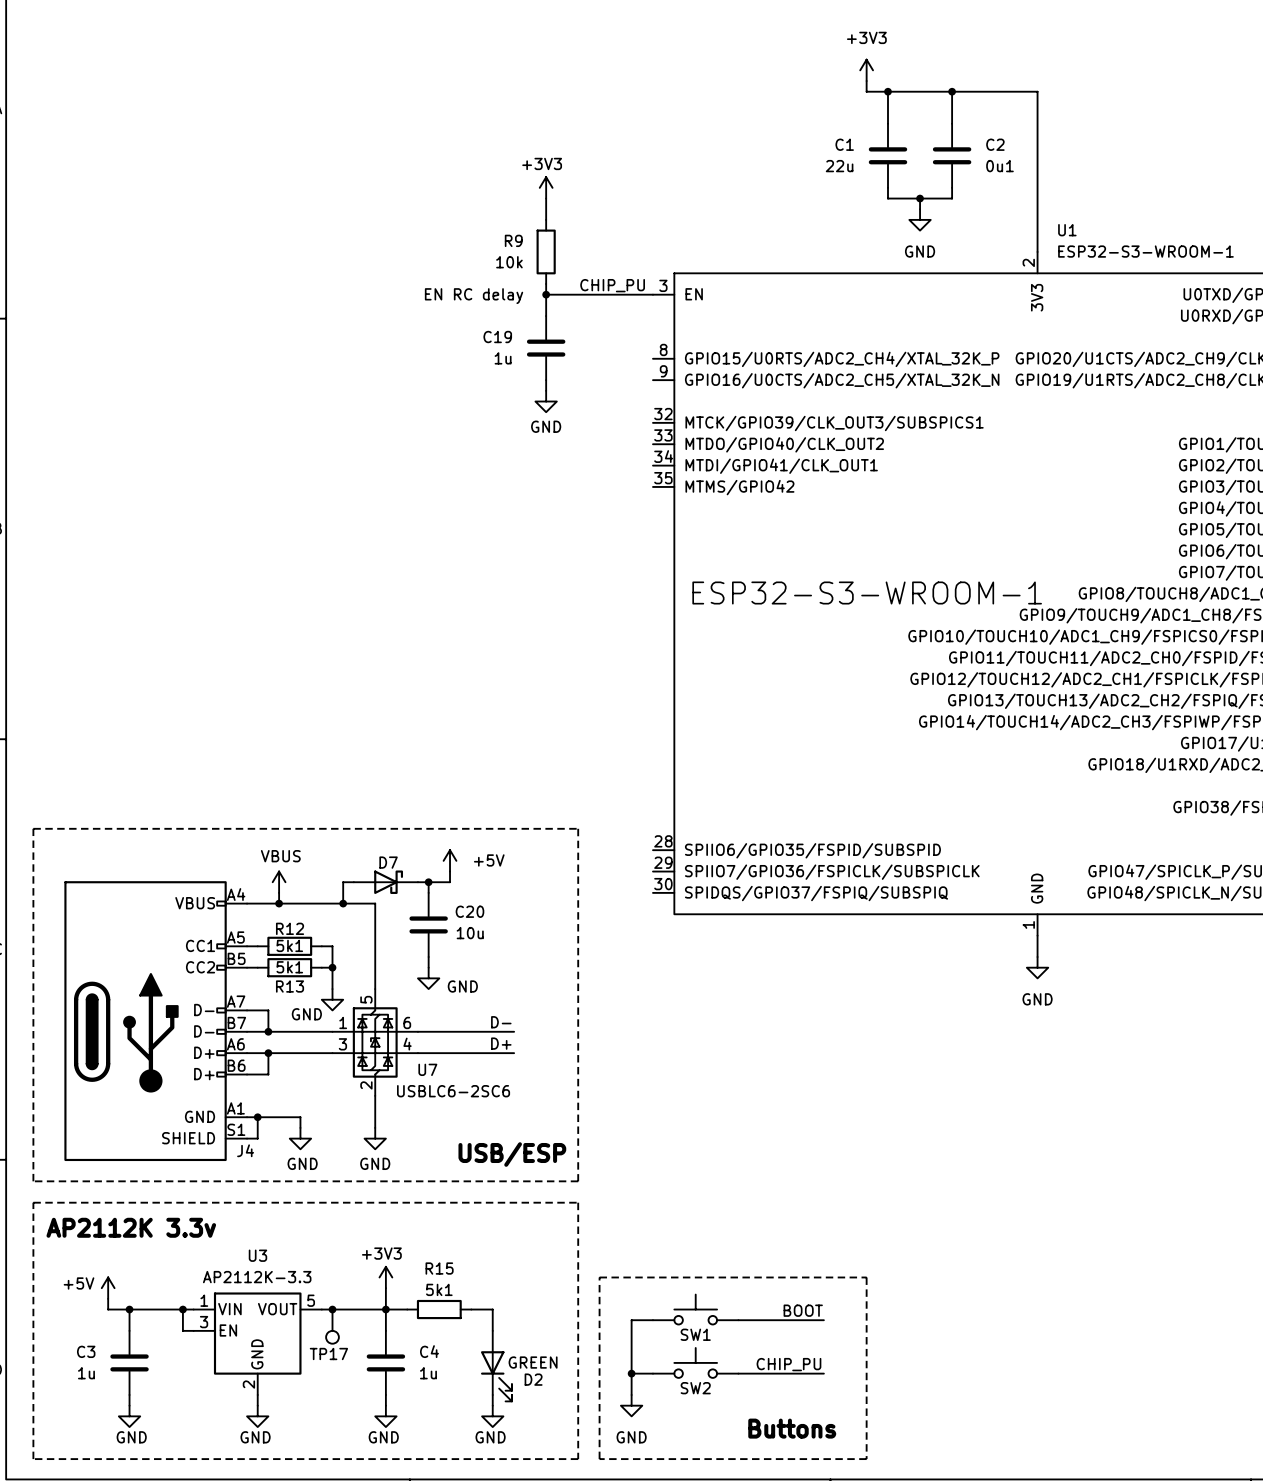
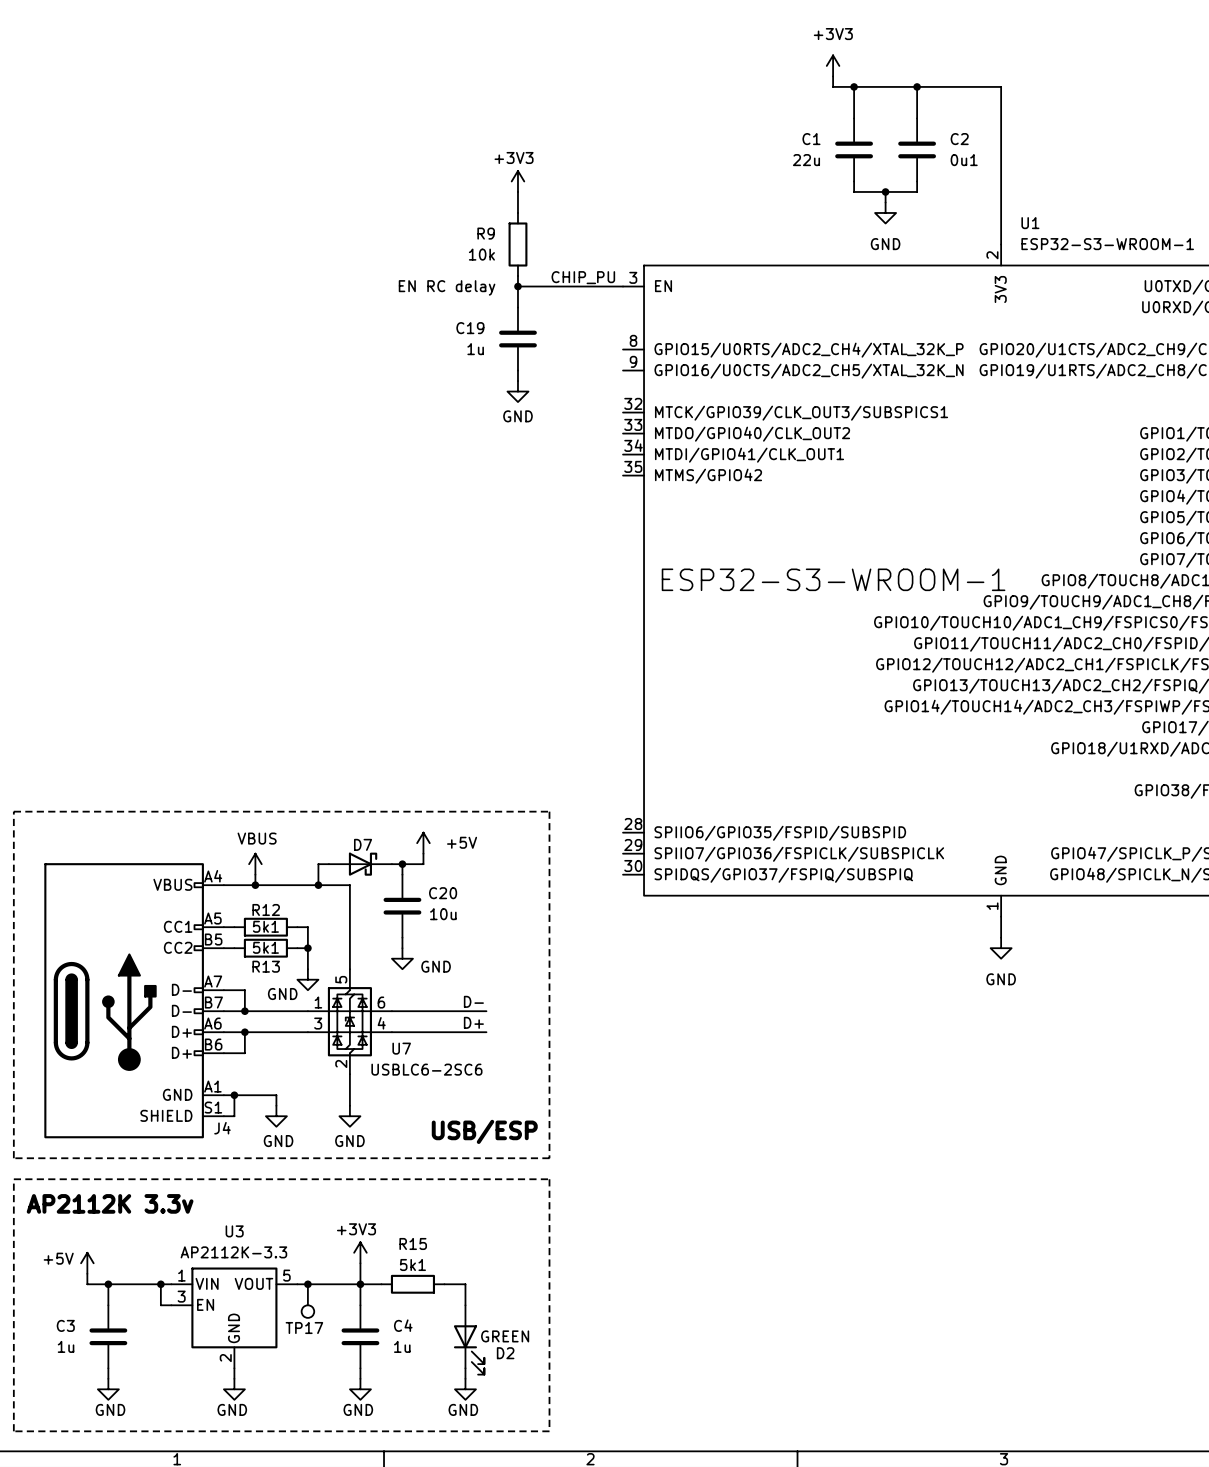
line: (599, 1277) (866, 1277) (866, 1459) (599, 1459) (599, 1277) -> none
SW1: (695, 1309) -> none
label: BOOT (803, 1310) -> none
wire: (652, 1320) (631, 1320) (631, 1394) -> none
wire: (738, 1320) (823, 1320) -> none
SW2: (695, 1362) -> none
label: CHIP_PU (788, 1364) -> none
wire: (631, 1373) (652, 1373) -> none
junction: (631, 1373) -> none
wire: (738, 1373) (823, 1373) -> none
power symbol: GND (631, 1405) -> none
text: Buttons (792, 1428) -> none

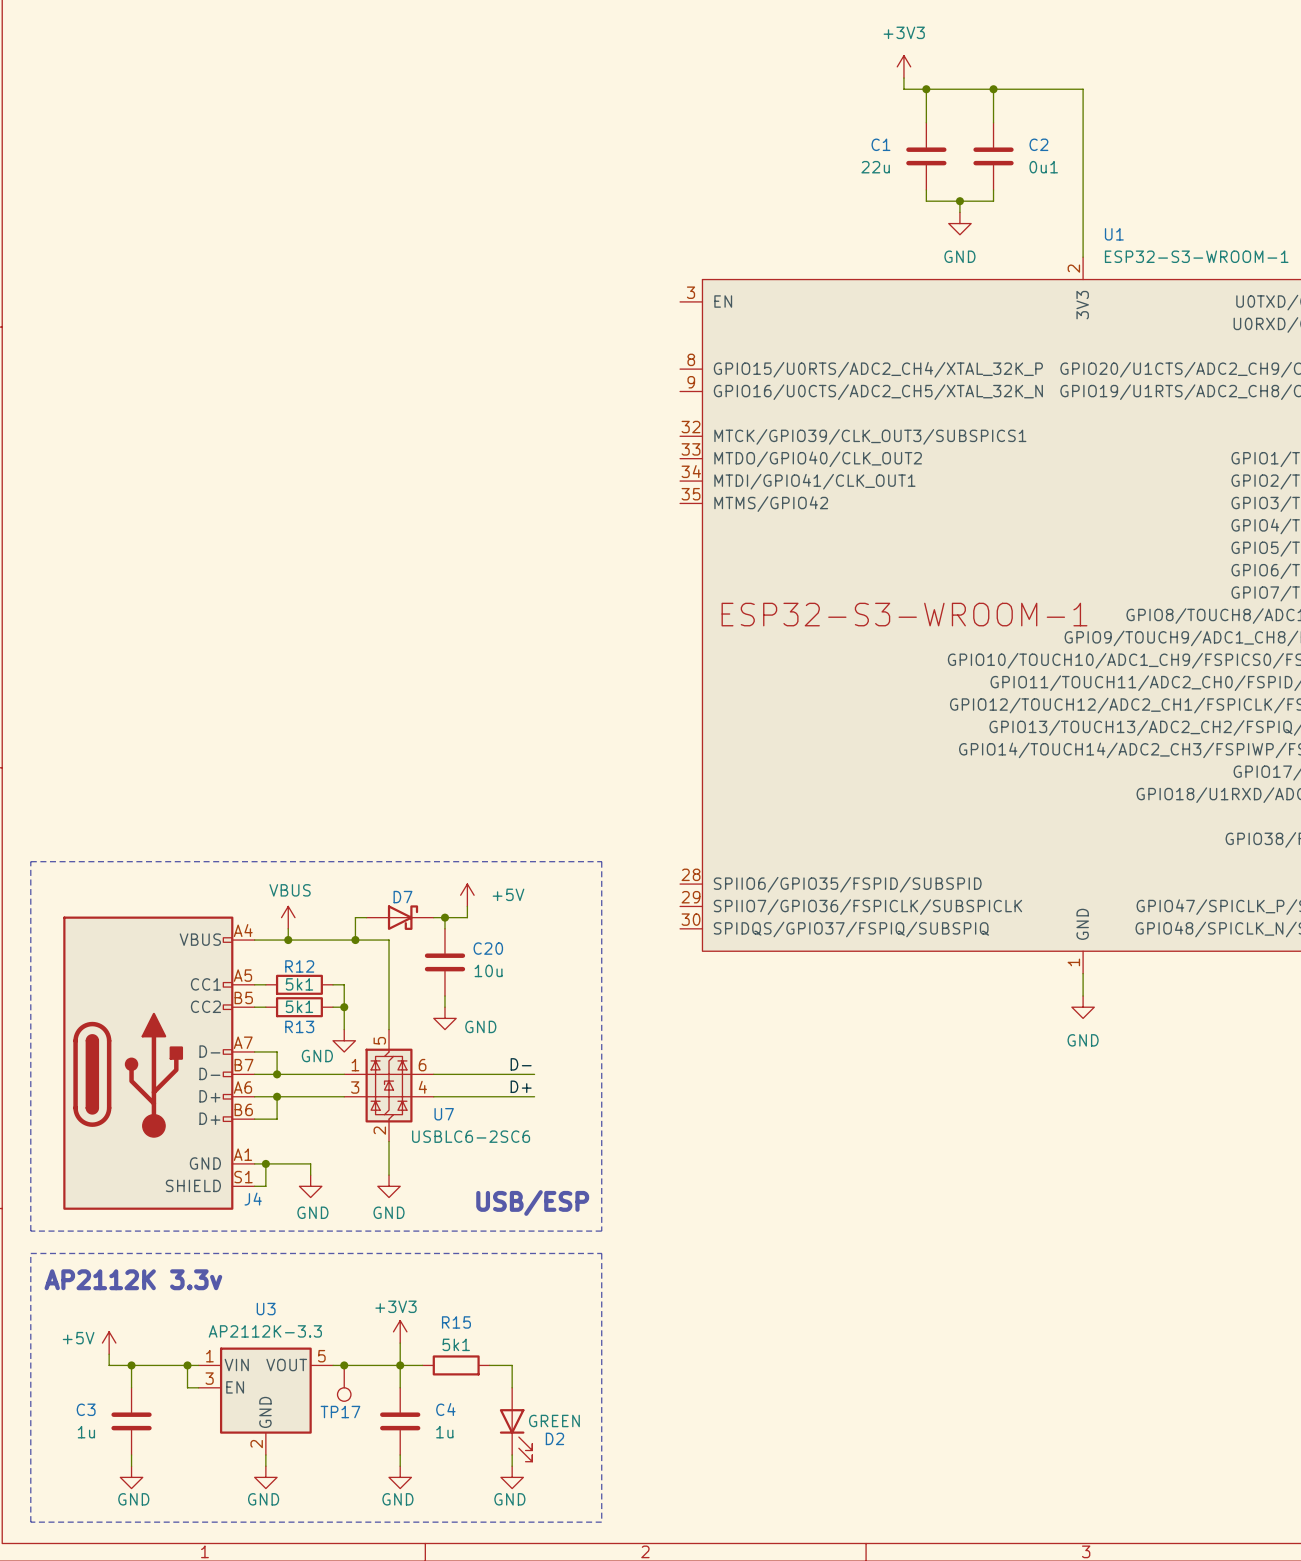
power symbol: +3V3 (517, 181) -> none
wire: (517, 191) (517, 212) -> none
R9: 10k (517, 244) -> none
wire: (517, 276) (517, 307) -> none
label: CHIP_PU (583, 277) -> none
wire: (517, 286) (623, 286) -> none
junction: (517, 286) -> none
text: EN RC delay (447, 287) -> none
C19: 1u (517, 339) -> none
wire: (517, 370) (517, 381) -> none
power symbol: GND (517, 391) -> none

